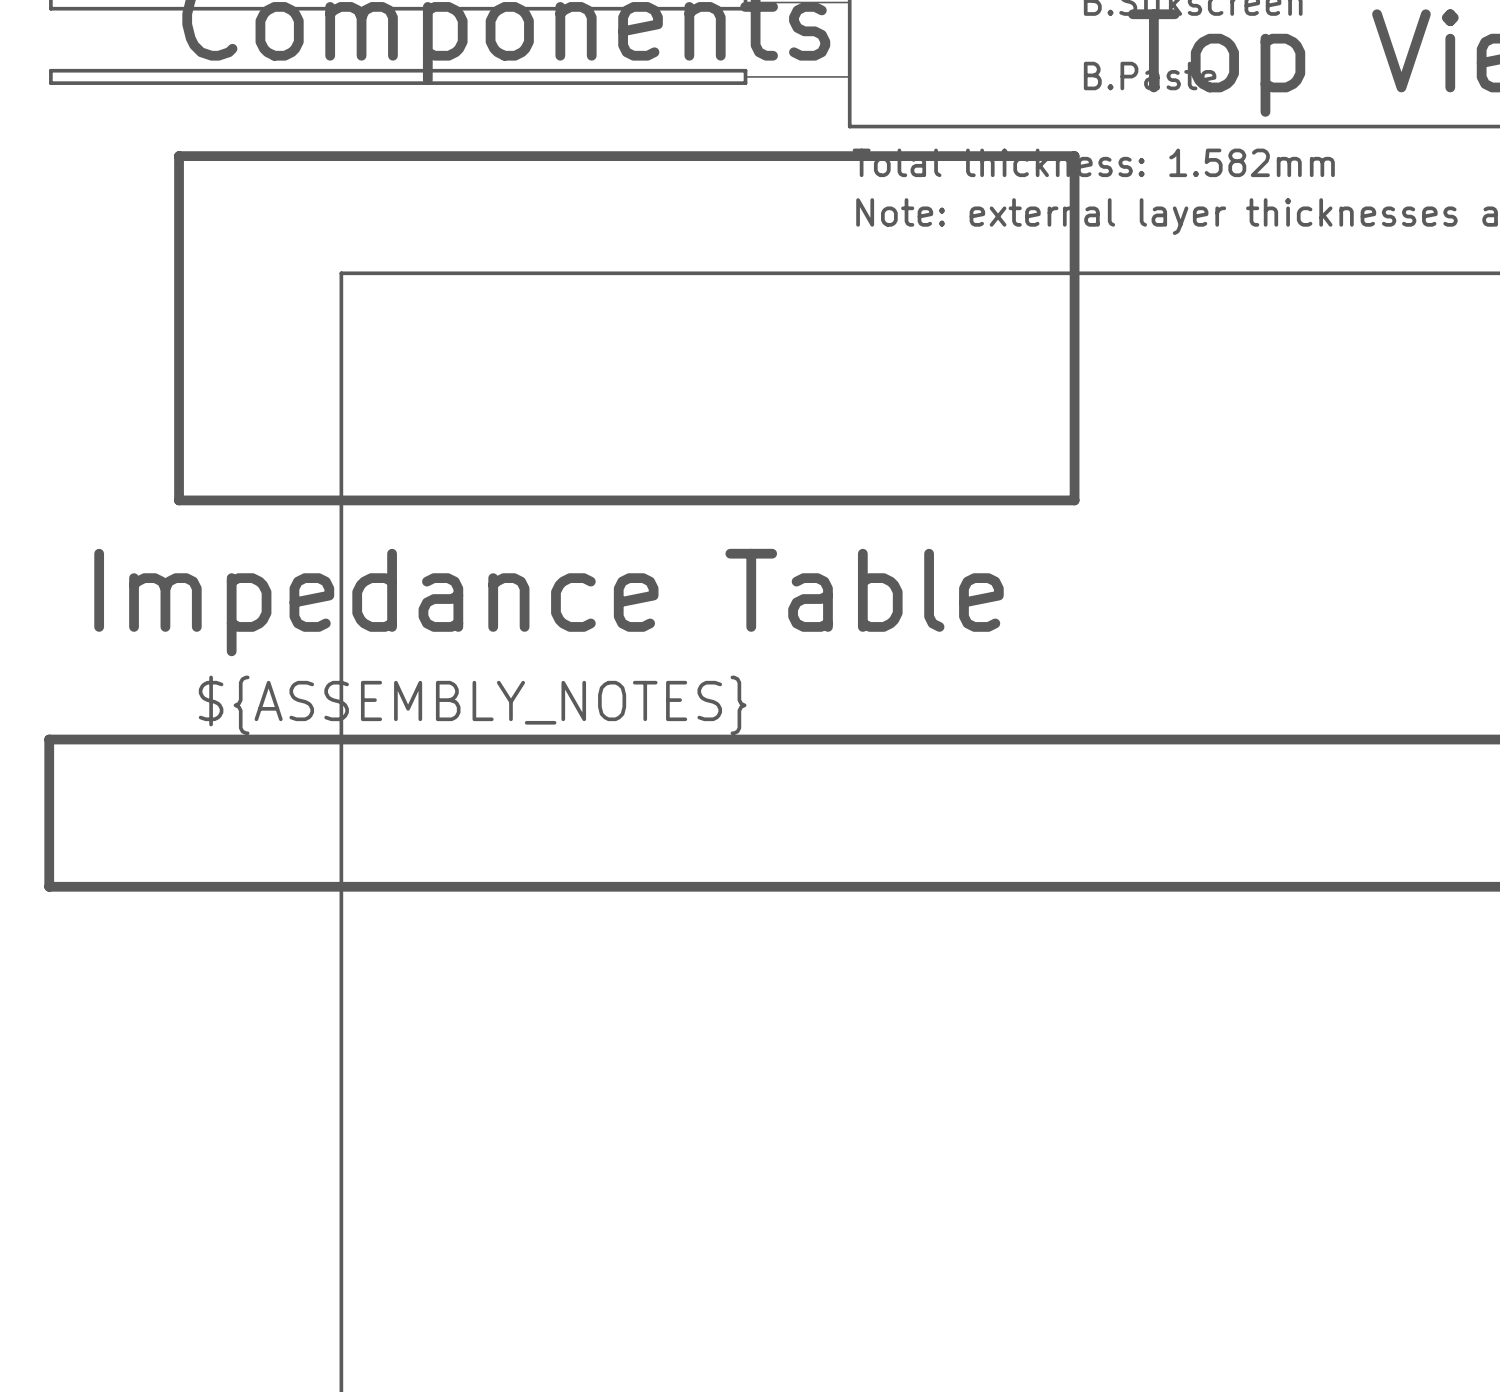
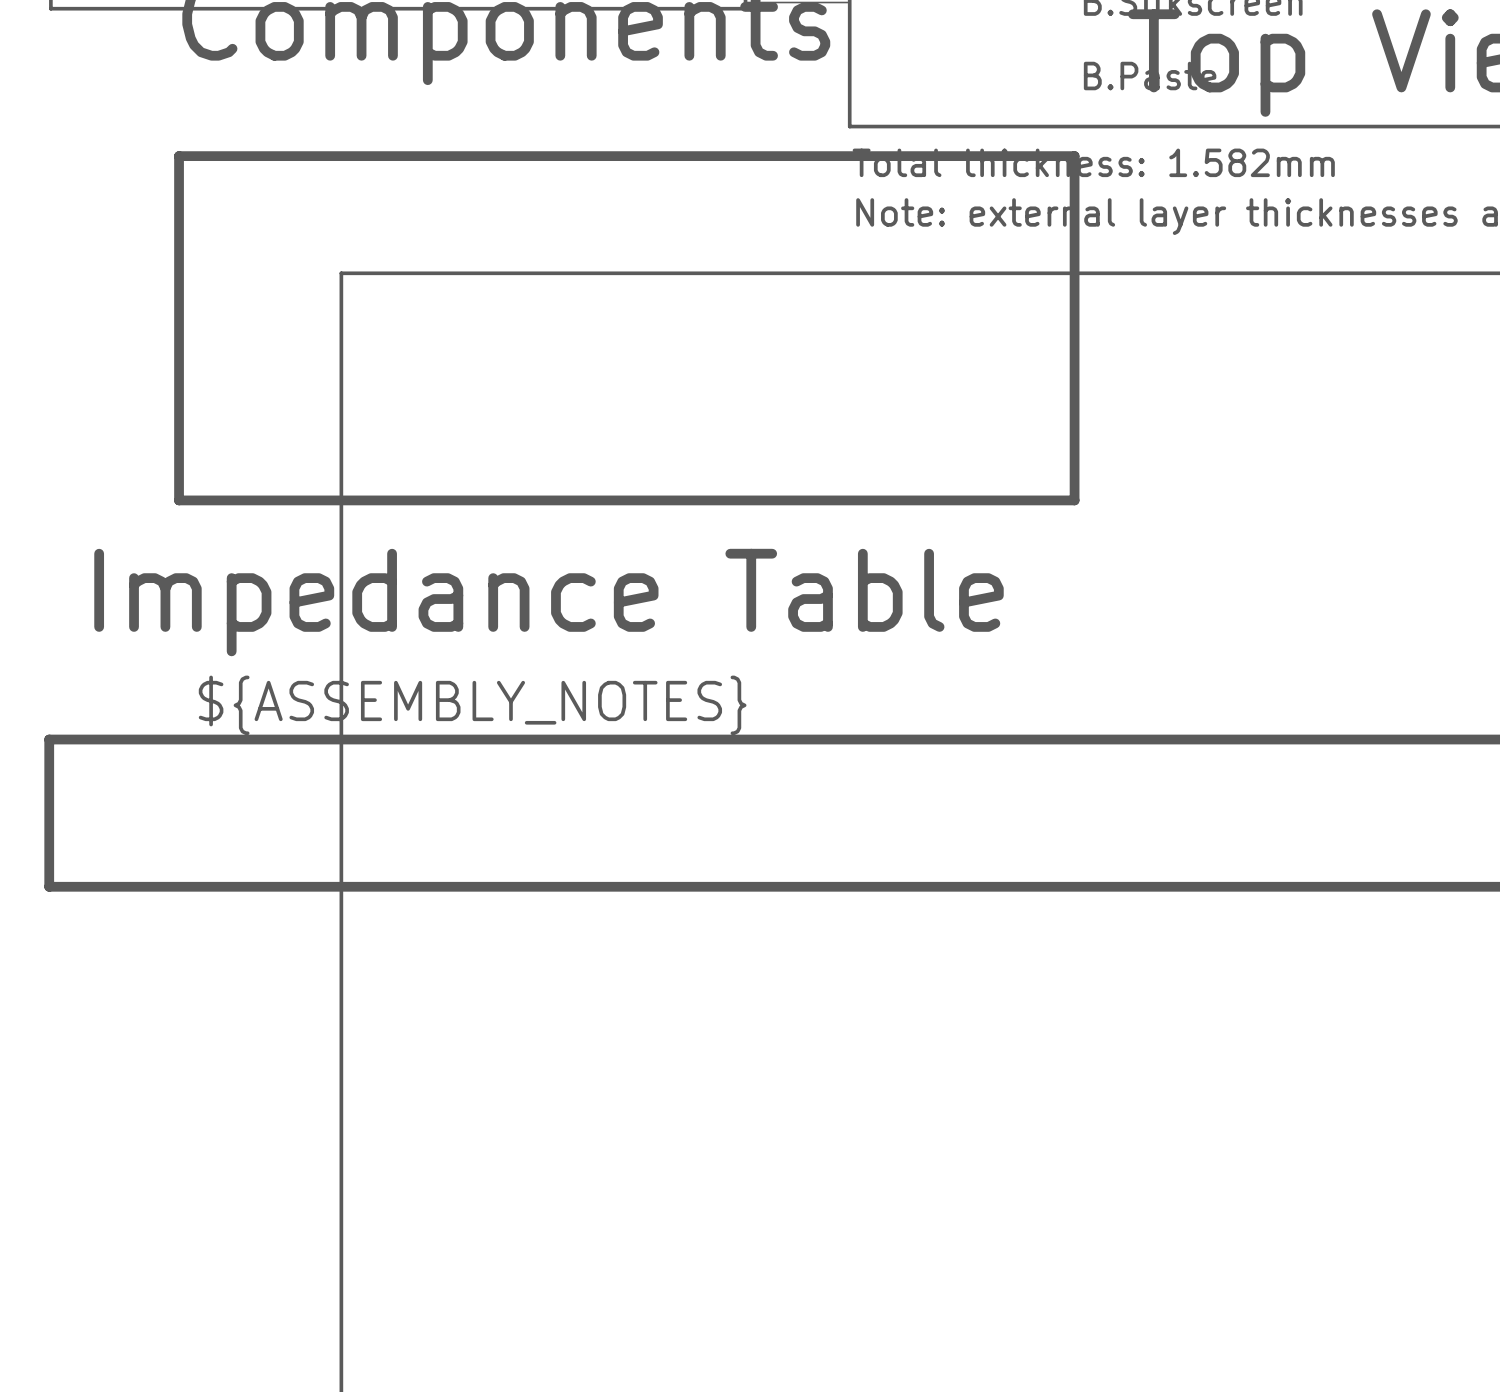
line: (50, 70) (745, 70) (745, 83) (50, 83) (50, 70) -> none
line: (745, 76) (849, 76) -> none

